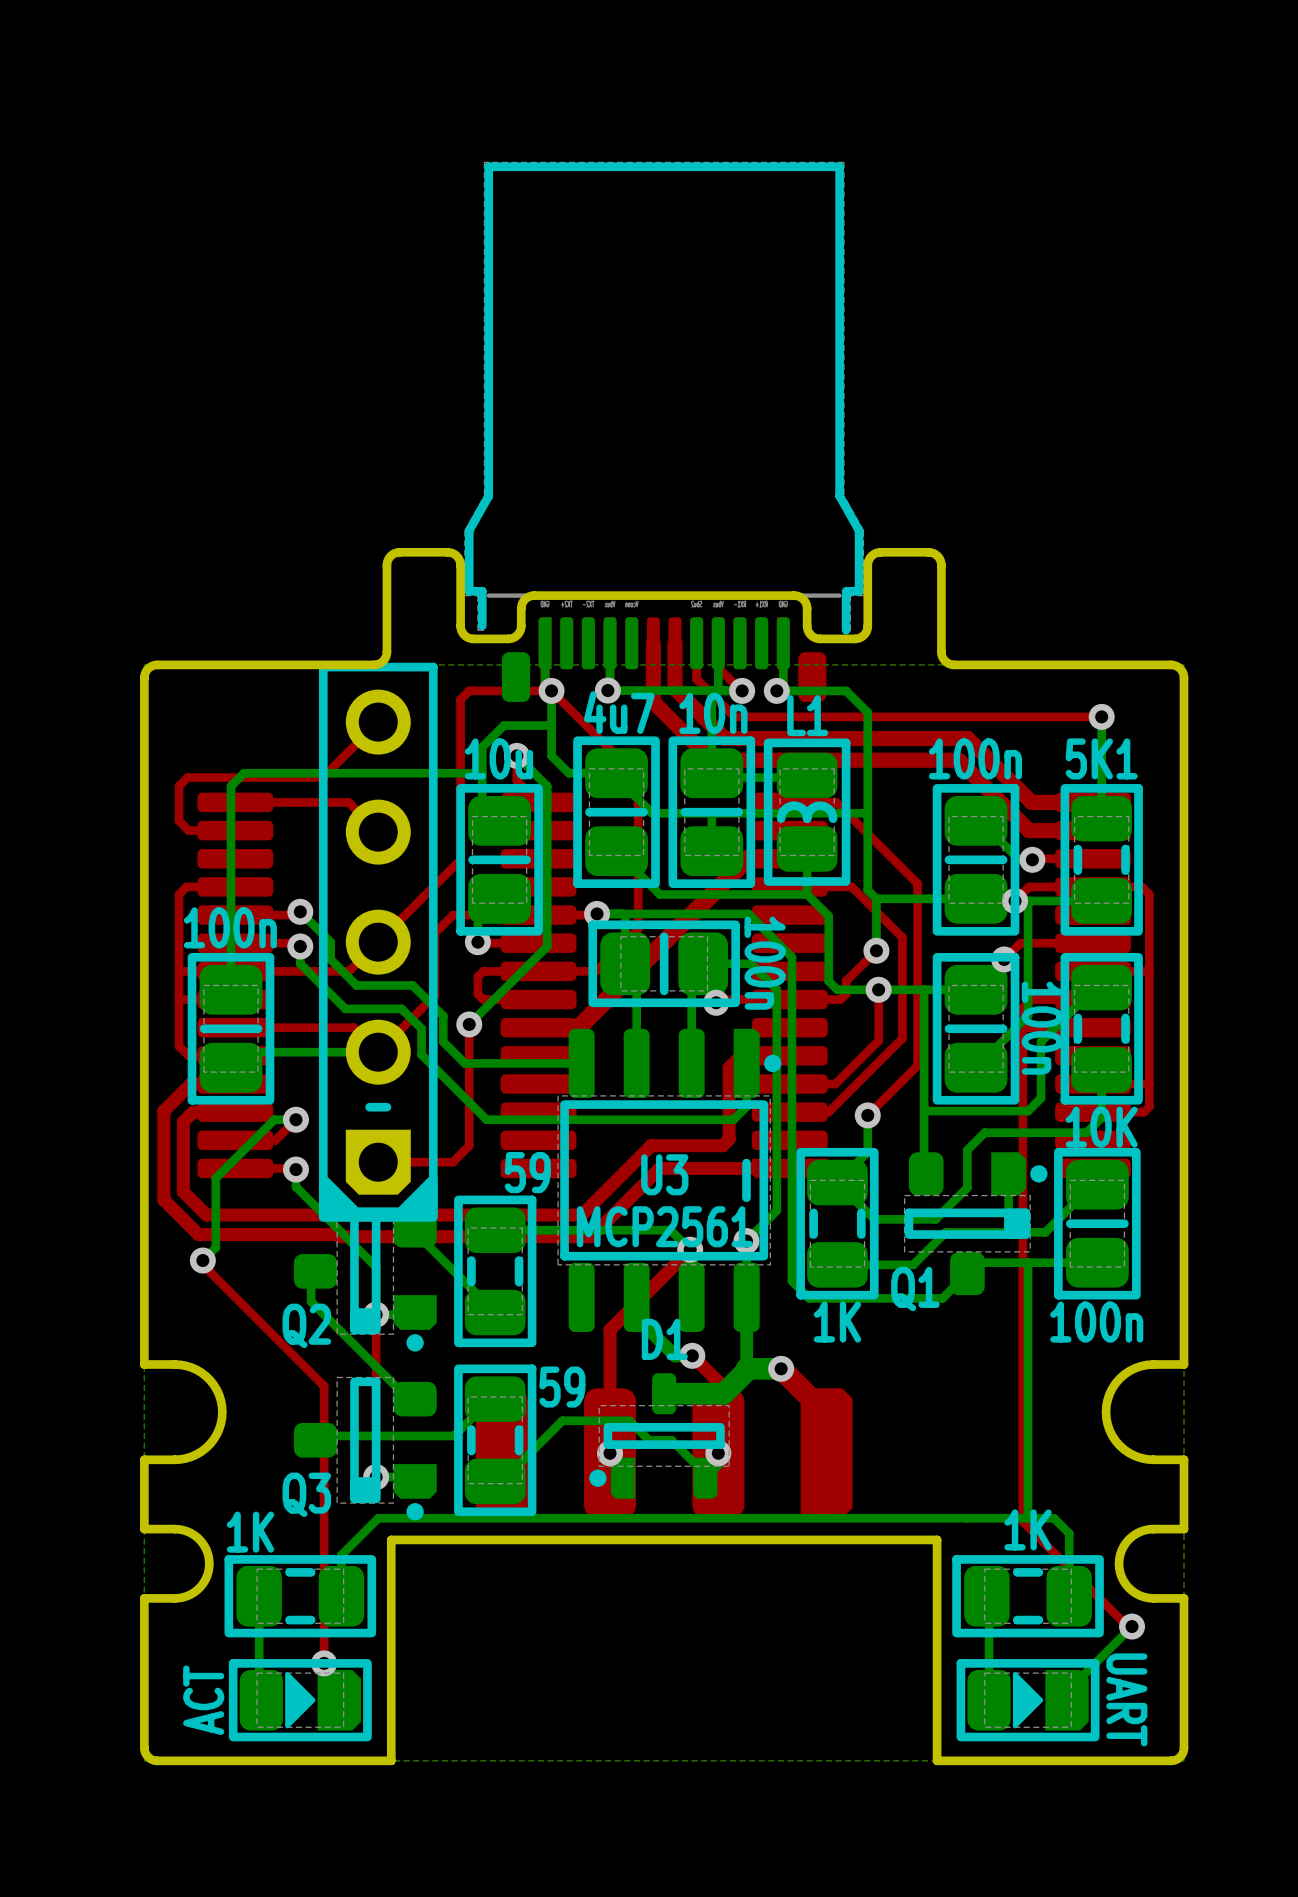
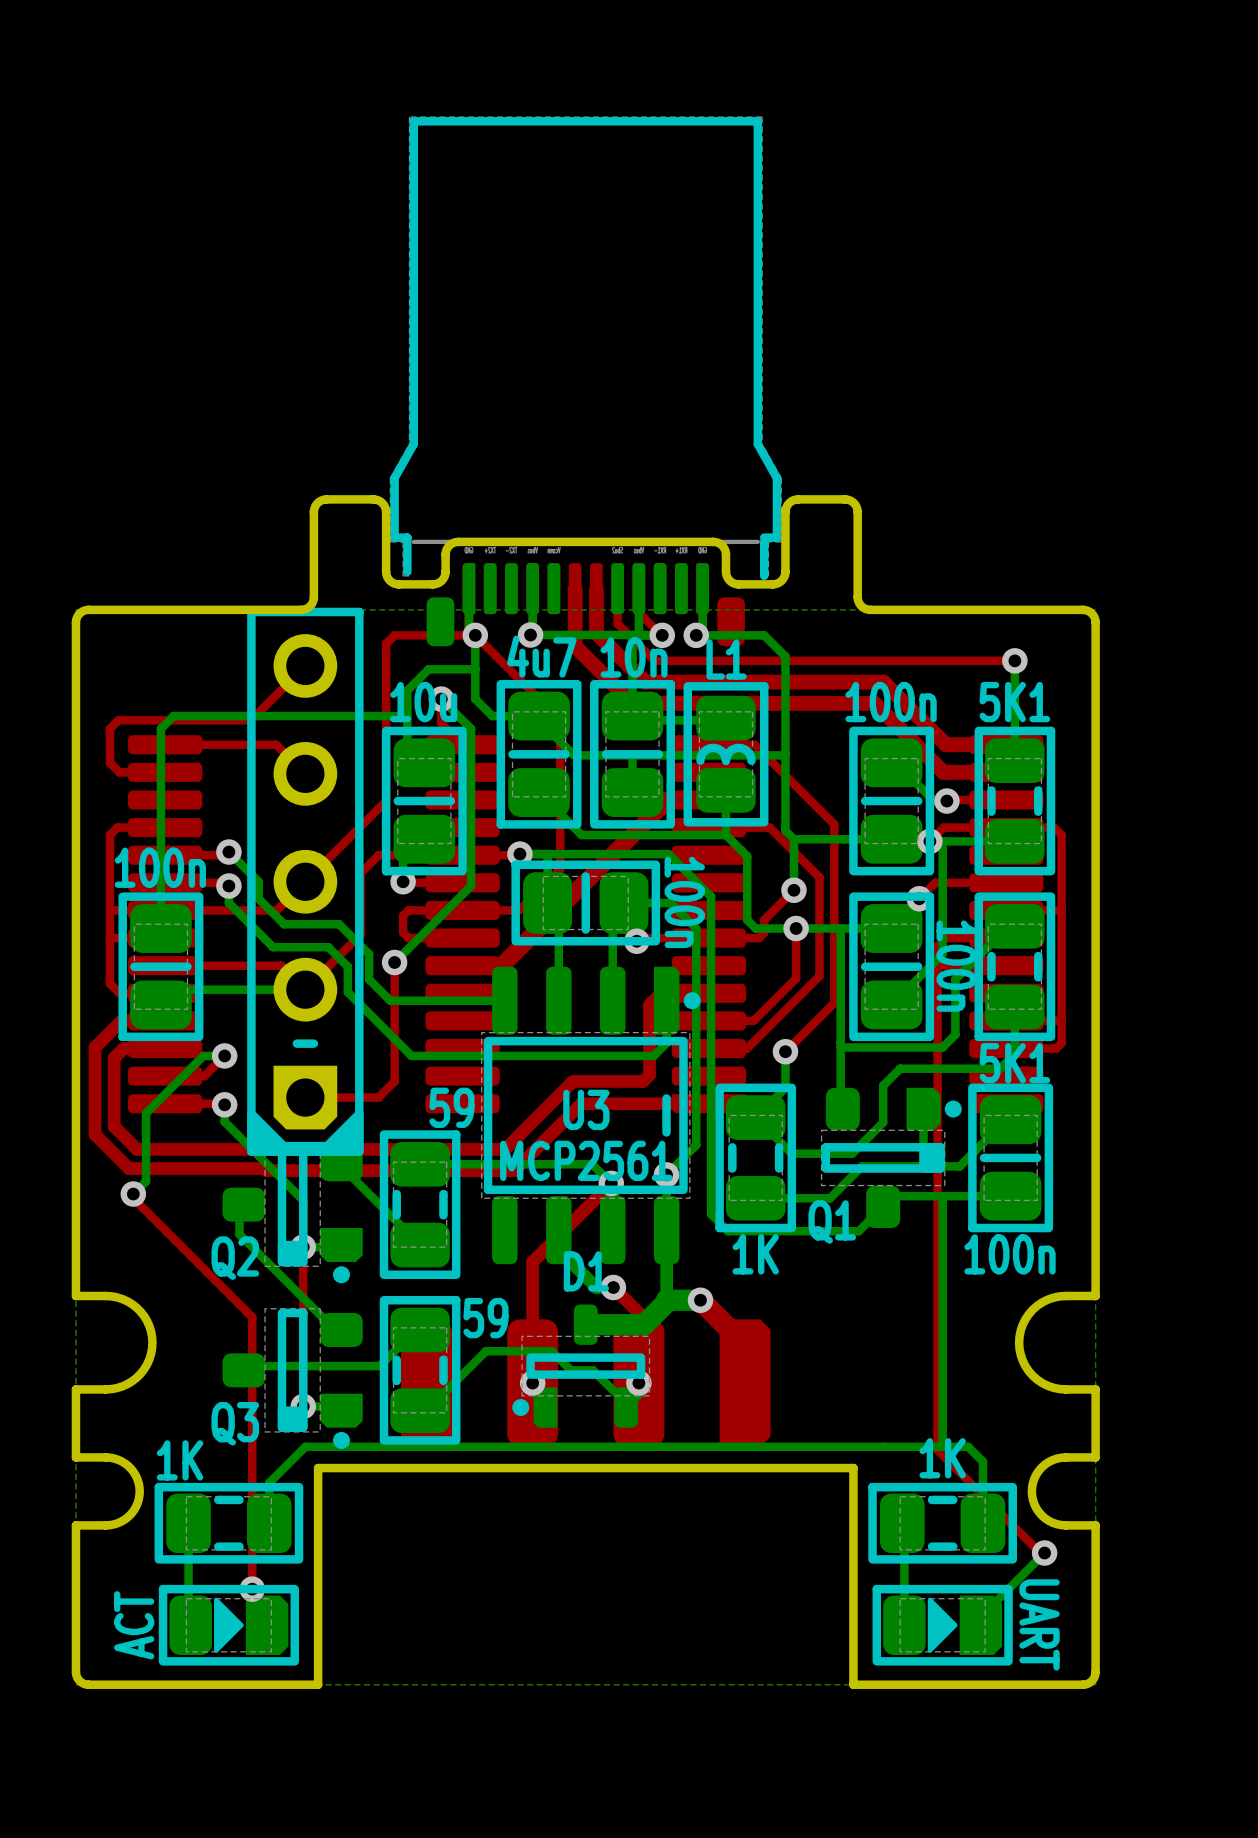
part value: 10K (1101, 1127) -> 5K1 (1014, 1063)

